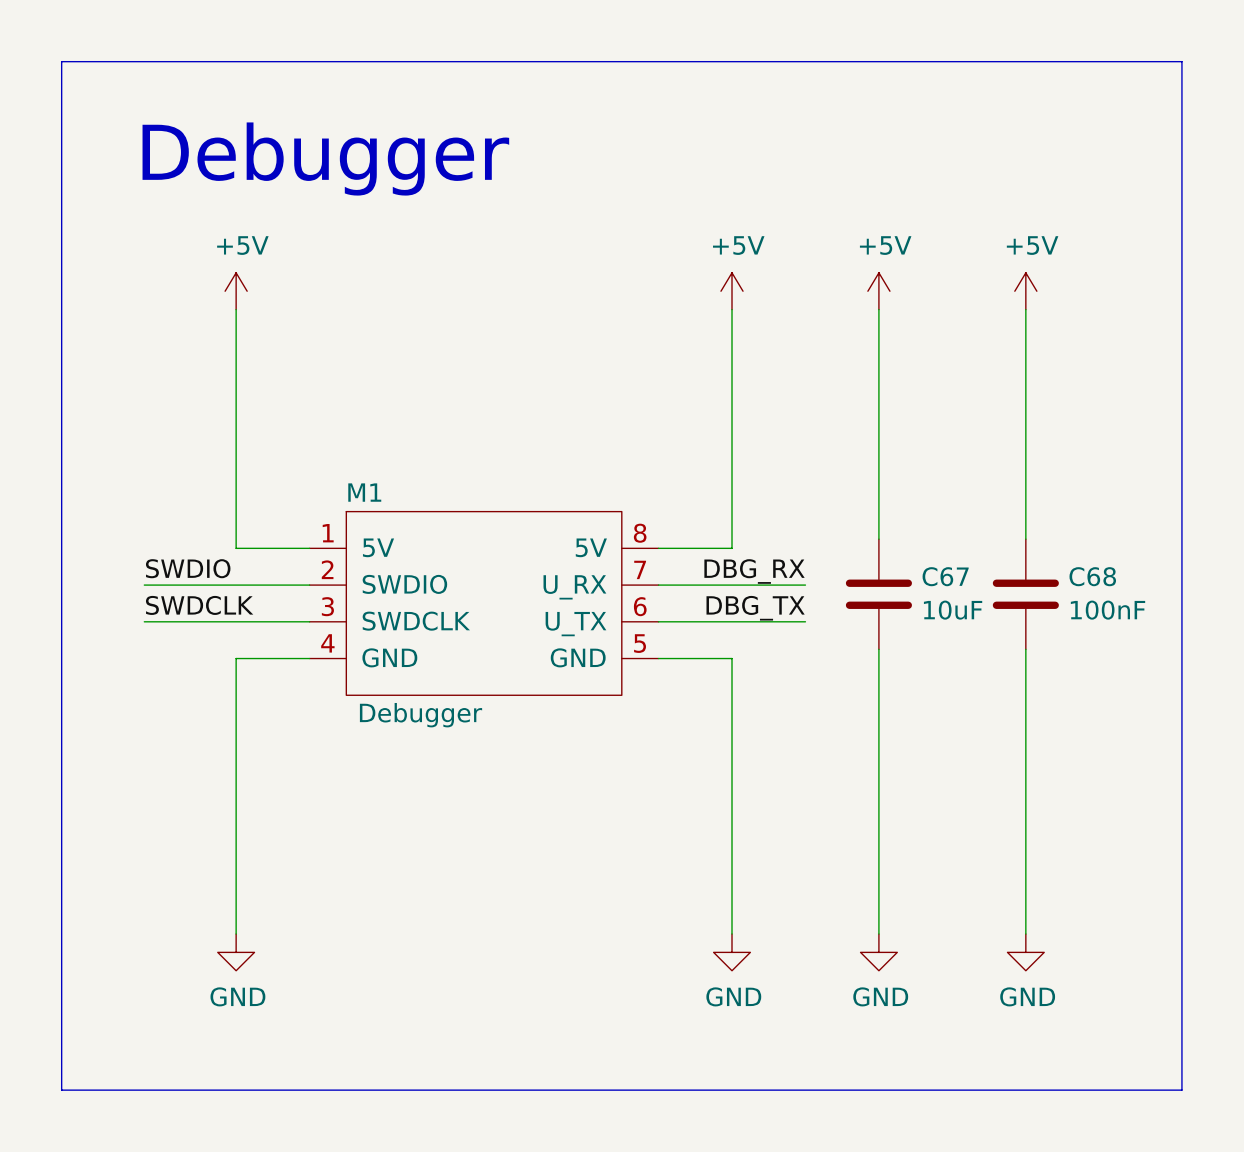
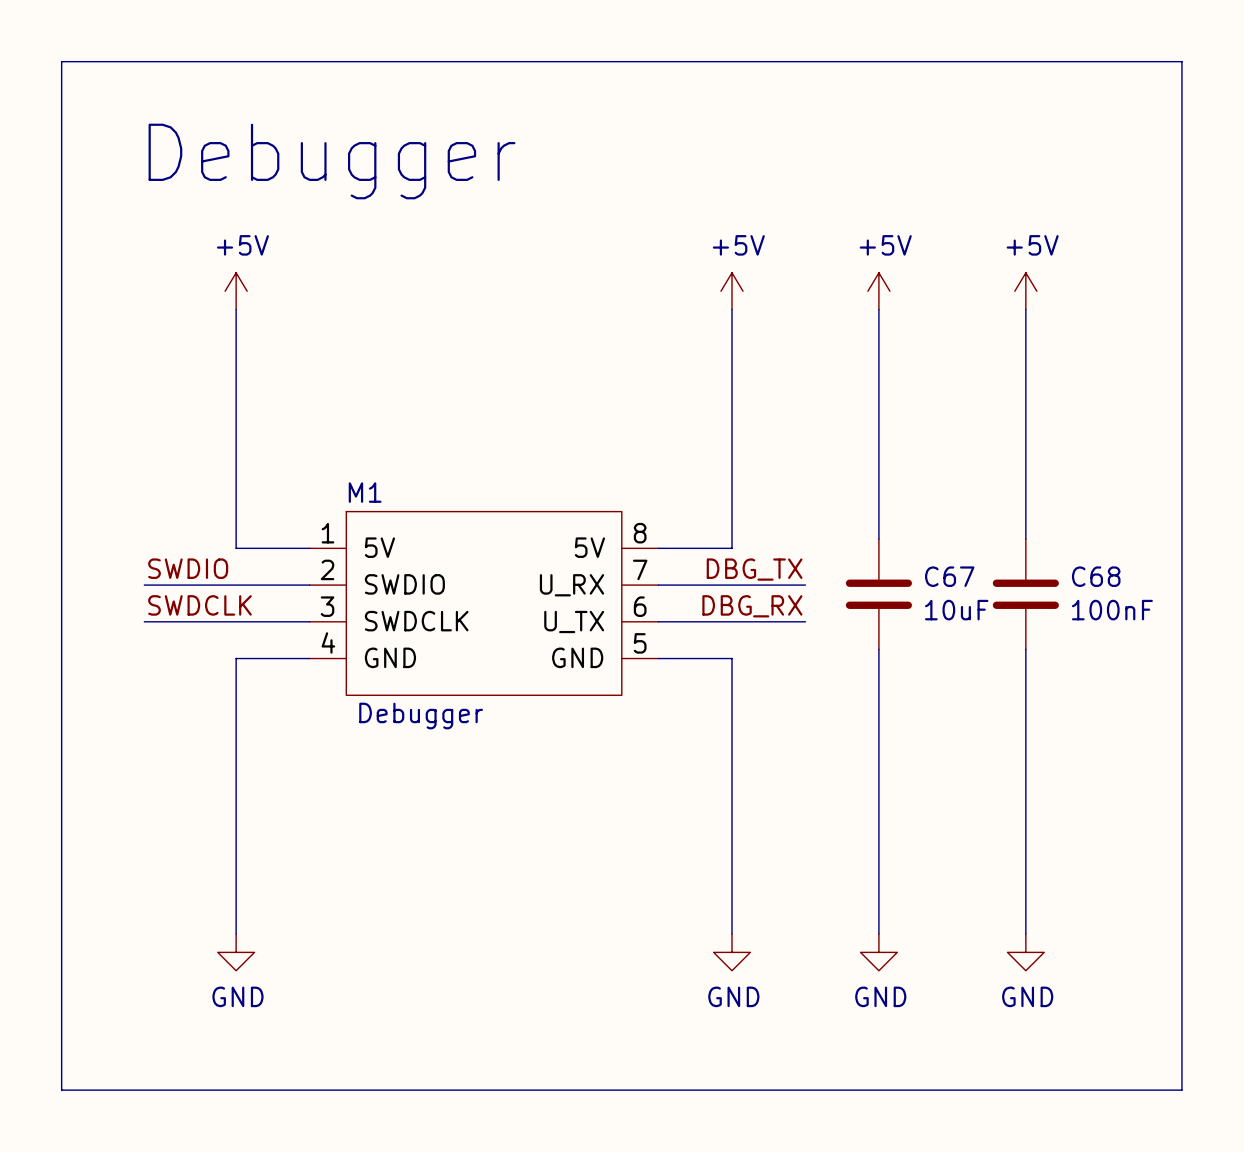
label: DBG_RX (754, 571) -> DBG_TX (754, 569)
label: DBG_TX (755, 608) -> DBG_RX (752, 606)

